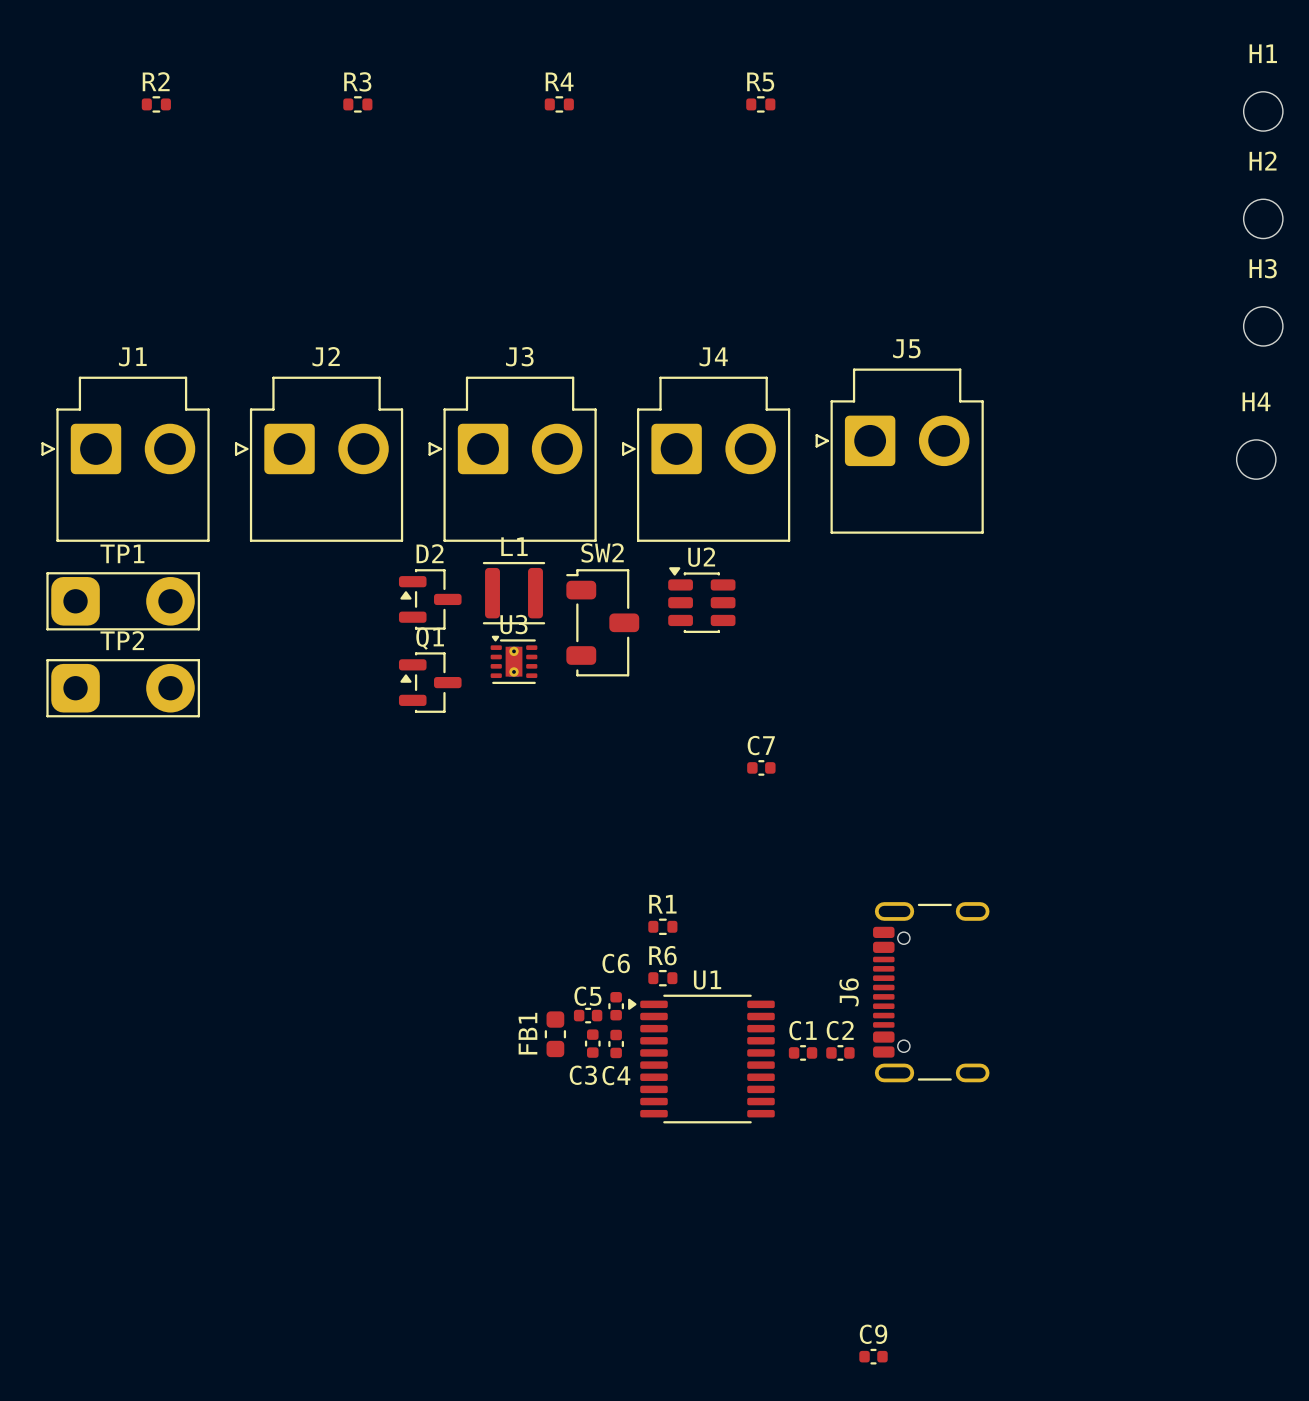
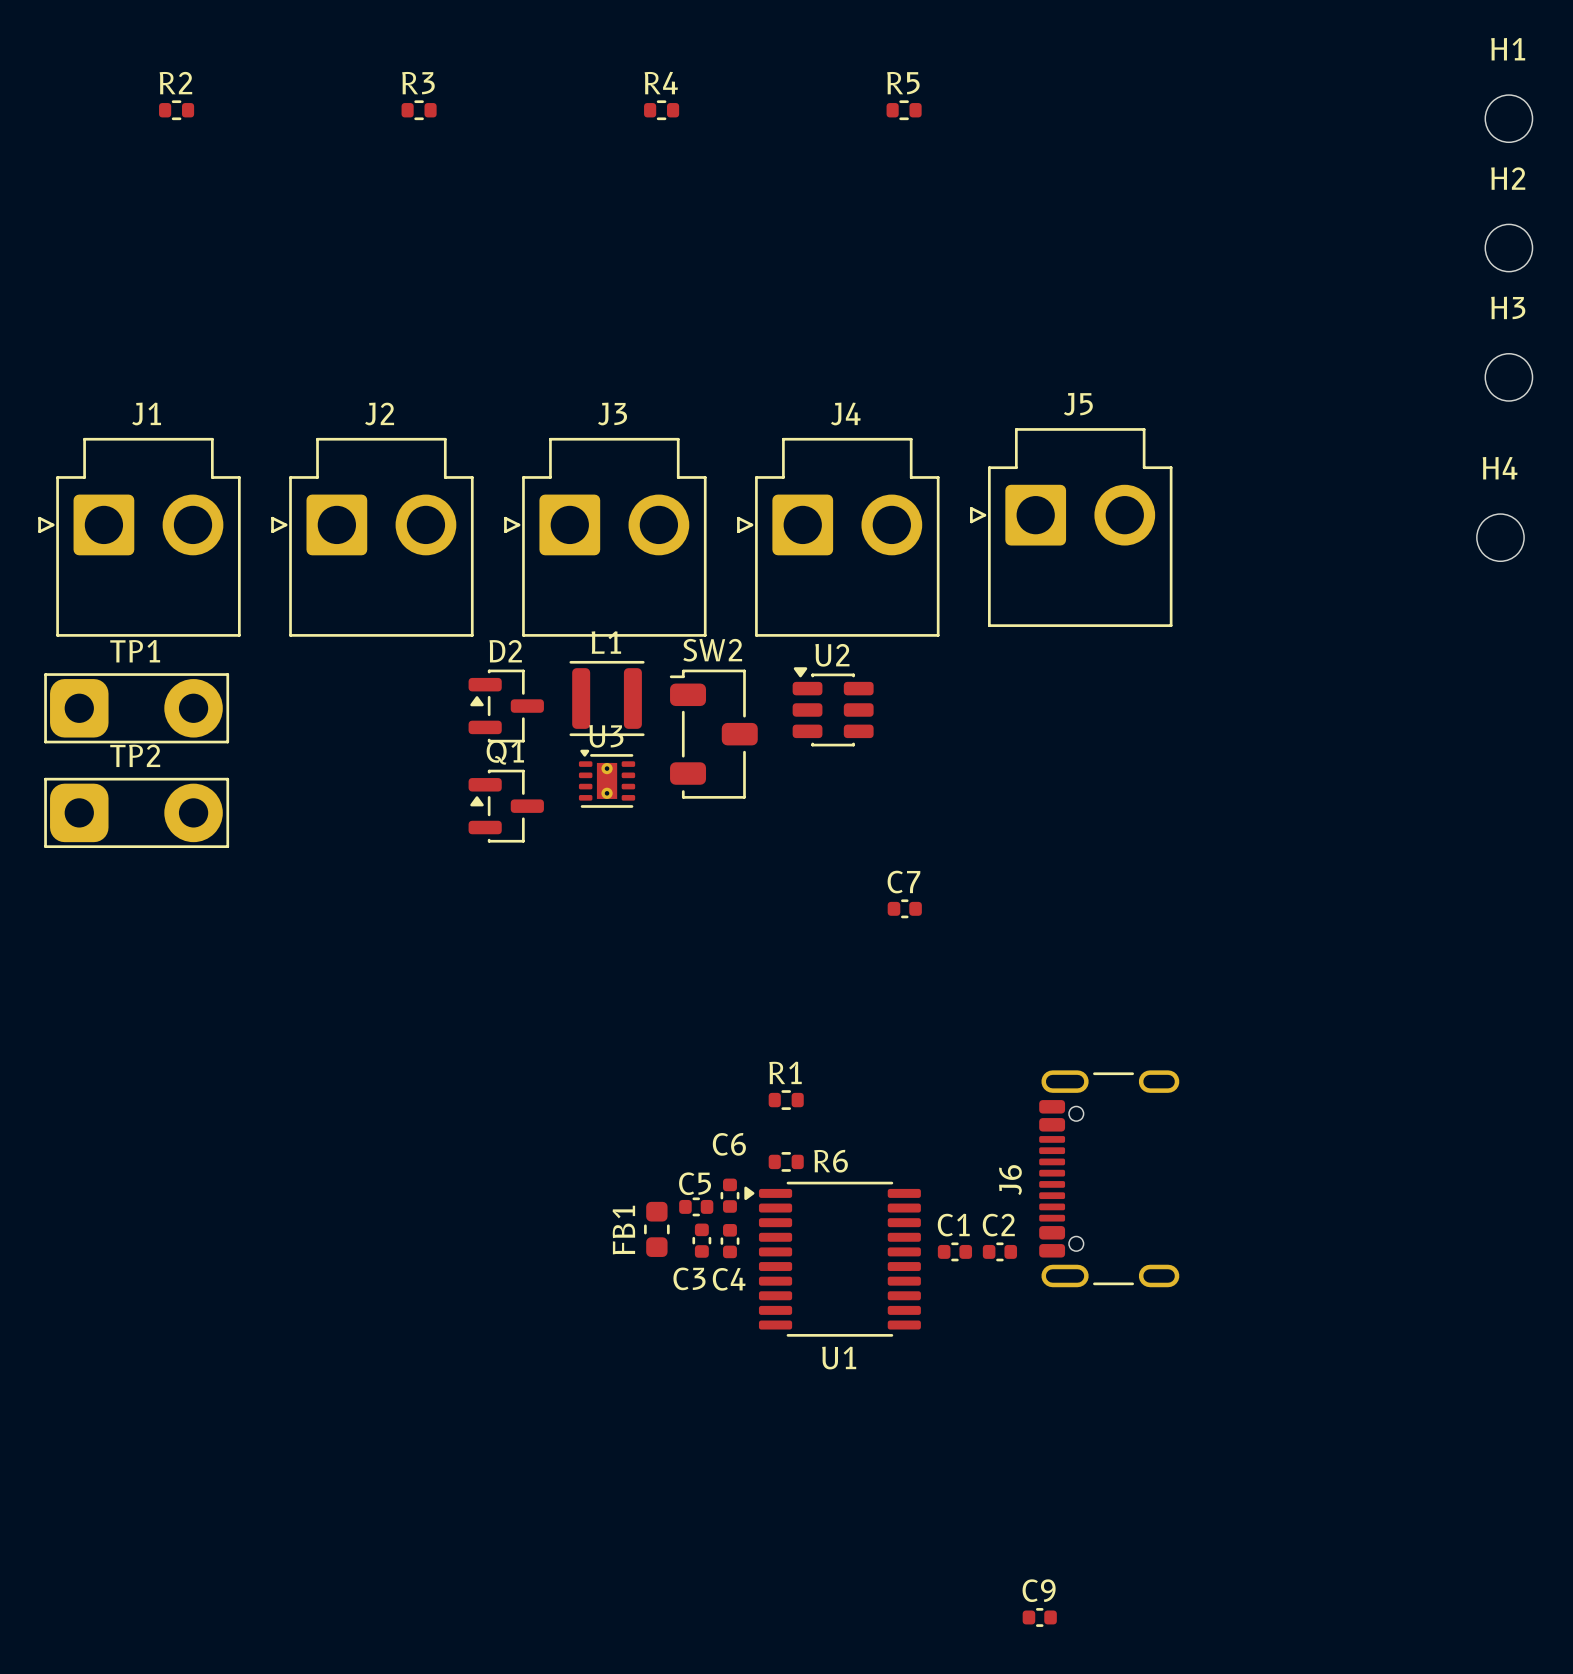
R6 name position: R6 (662, 955) -> R6 (831, 1161)
U1 name position: U1 (707, 980) -> U1 (839, 1358)

